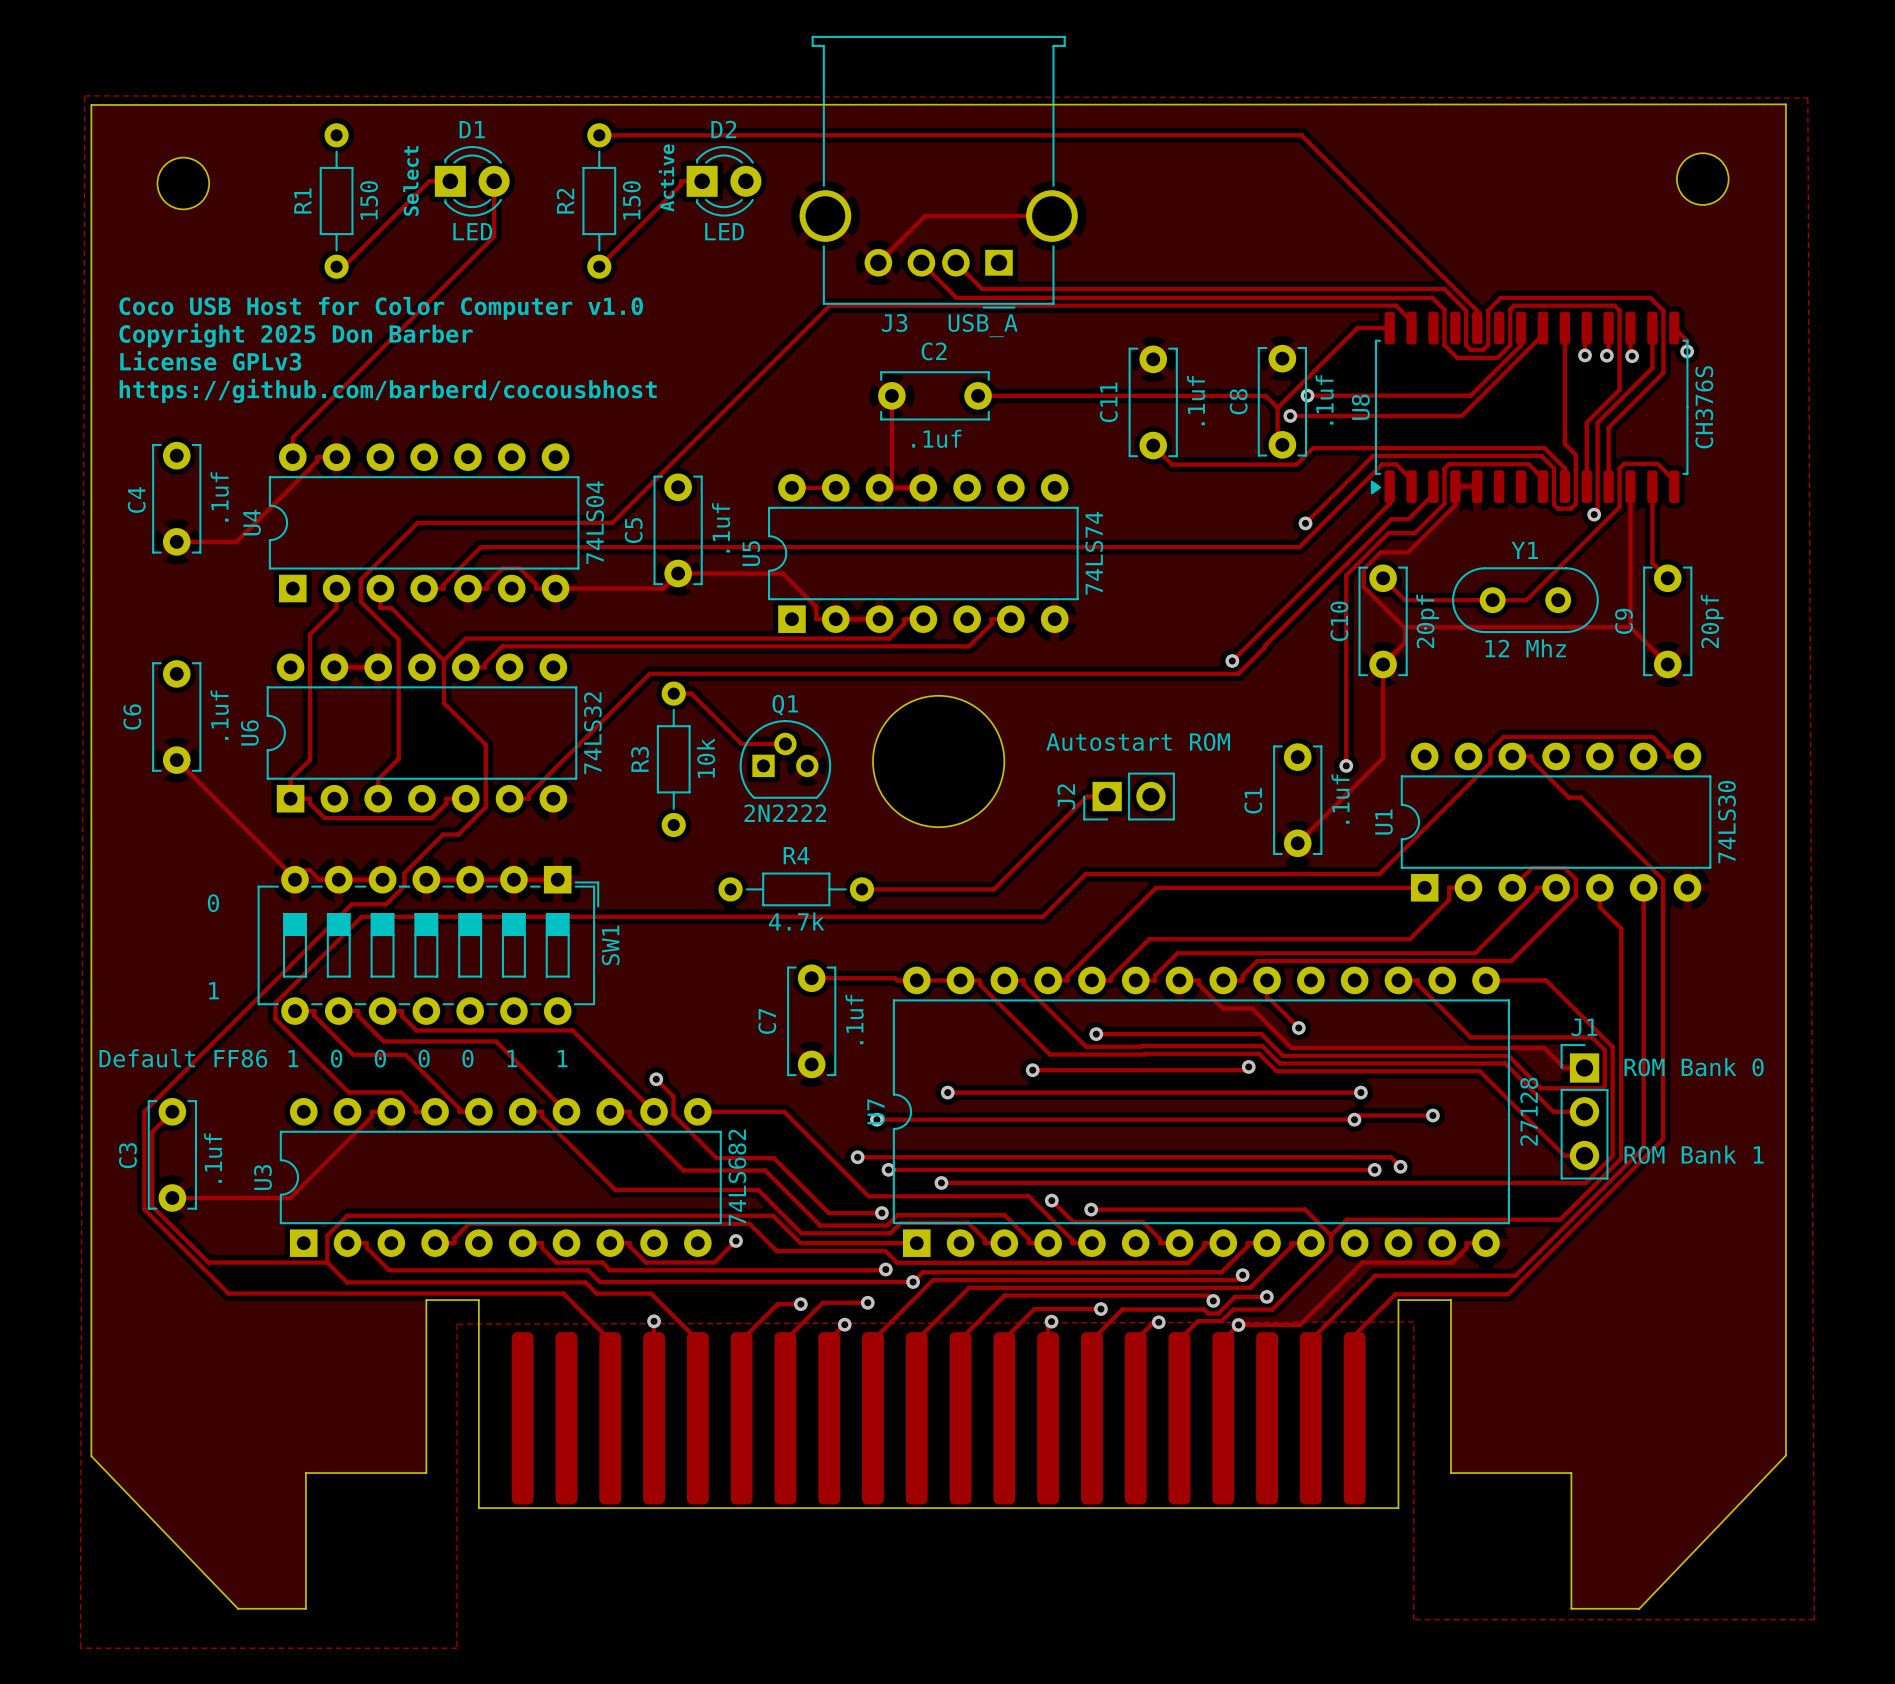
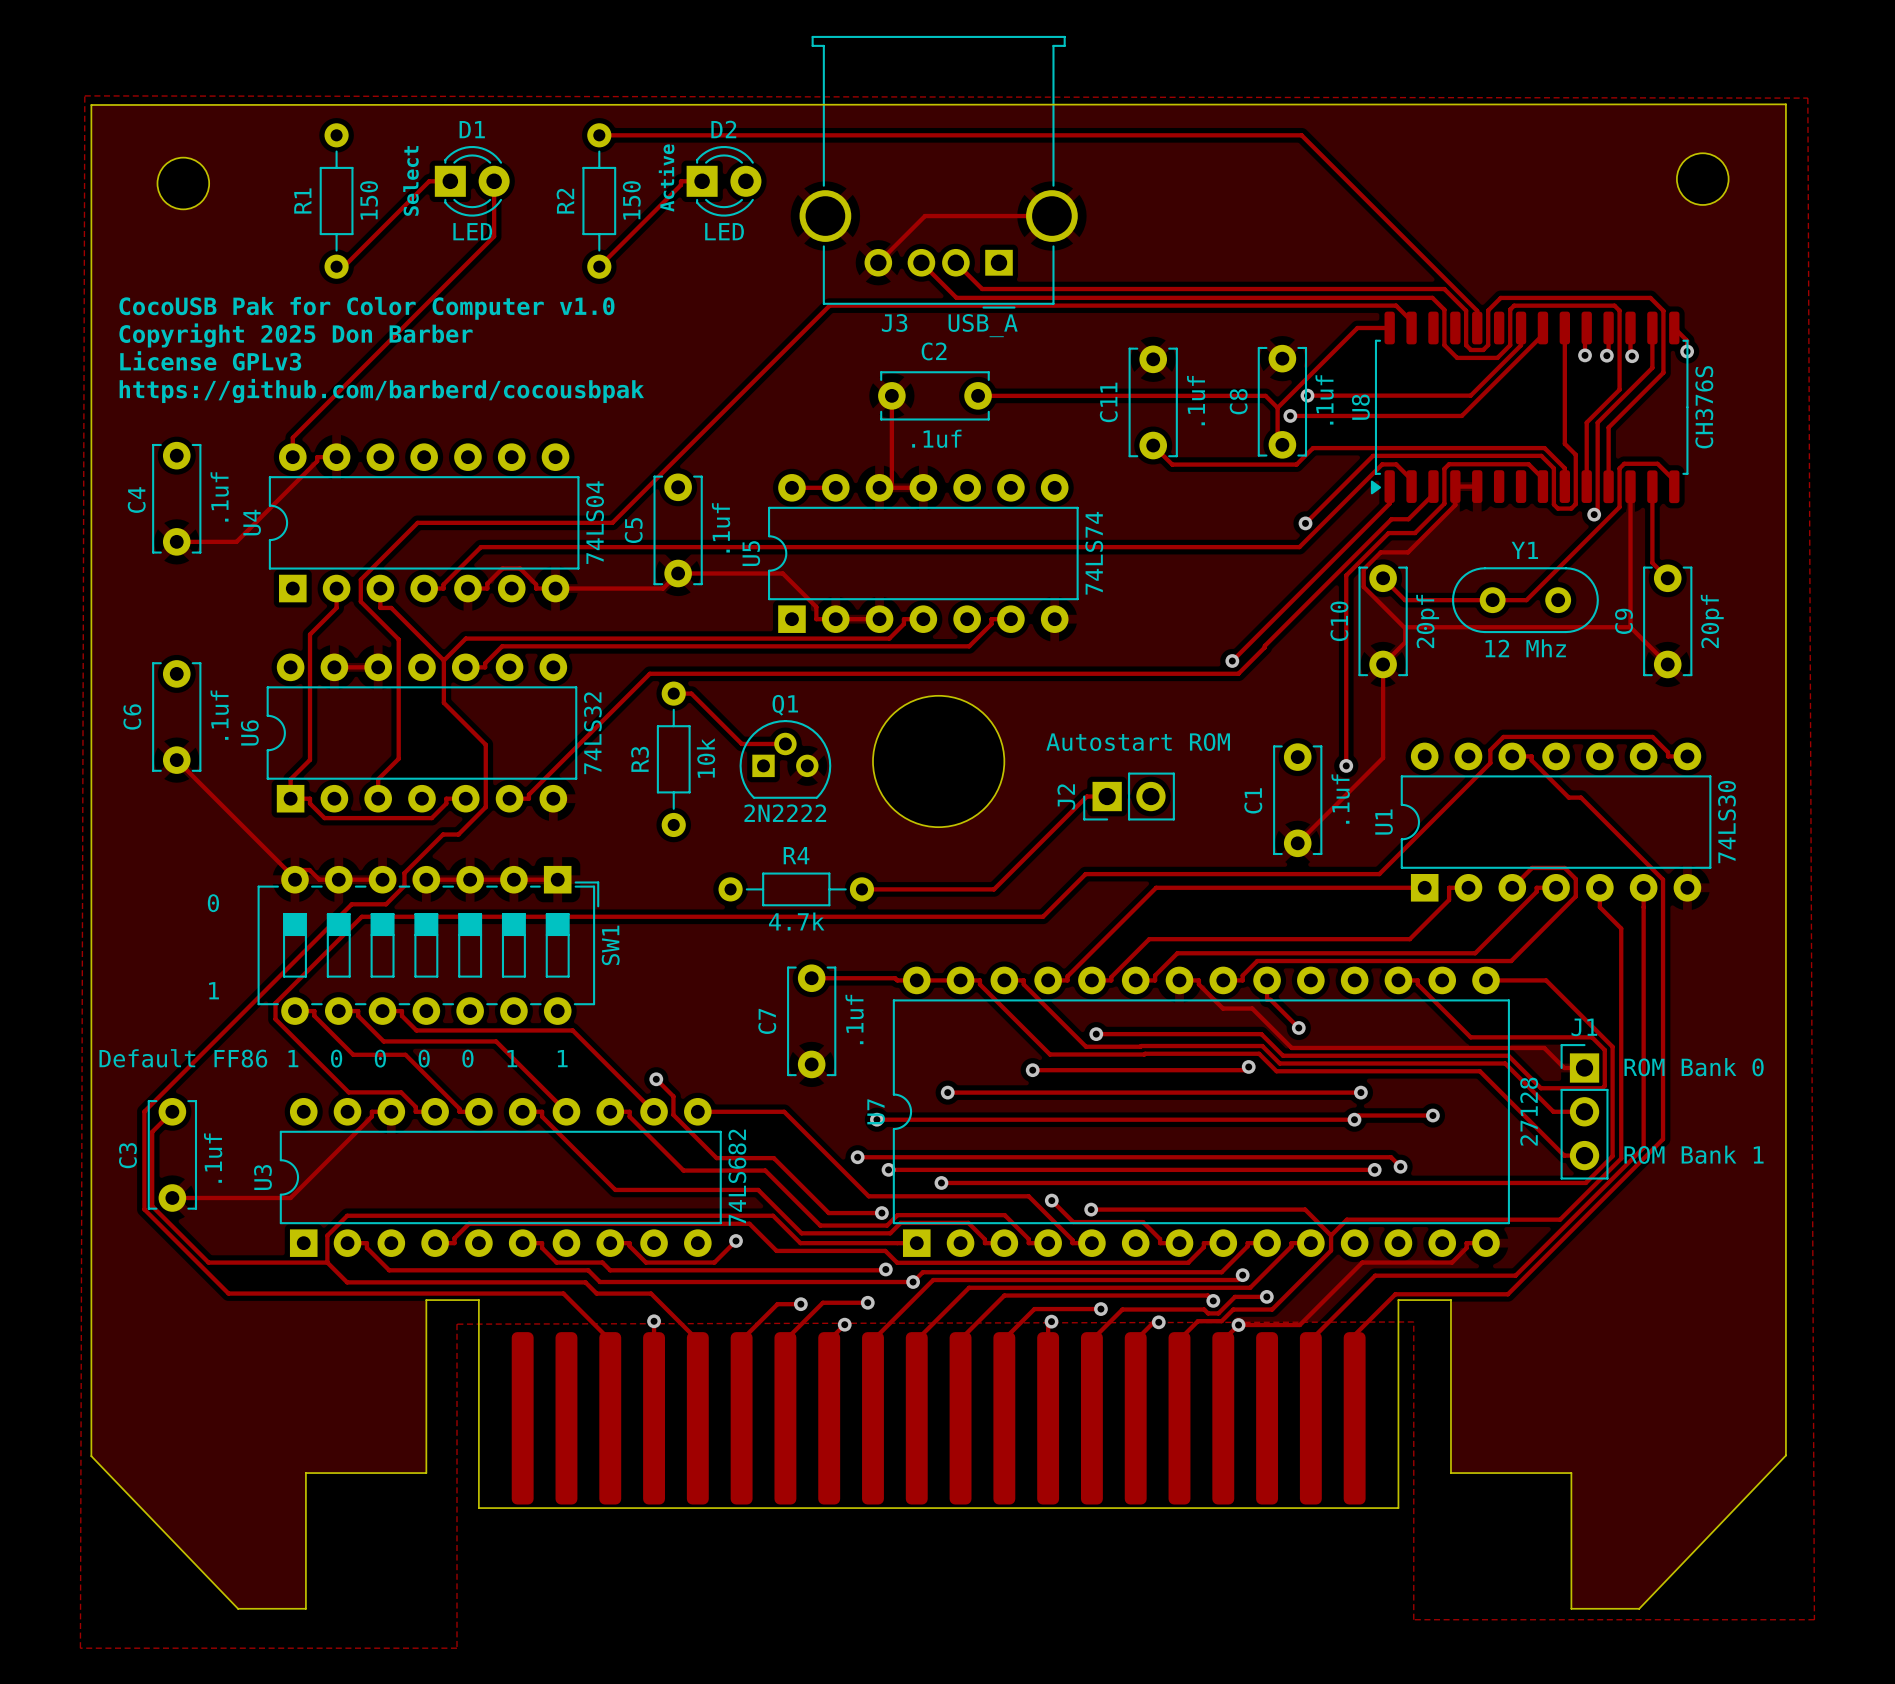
text: Coco USB Host for Color Computer v1.0 (381, 308) -> CocoUSB Pak for Color Computer v1.0 (366, 308)
text: https://github.com/barberd/cocousbhost (388, 390) -> https://github.com/barberd/cocousbpak (381, 390)

